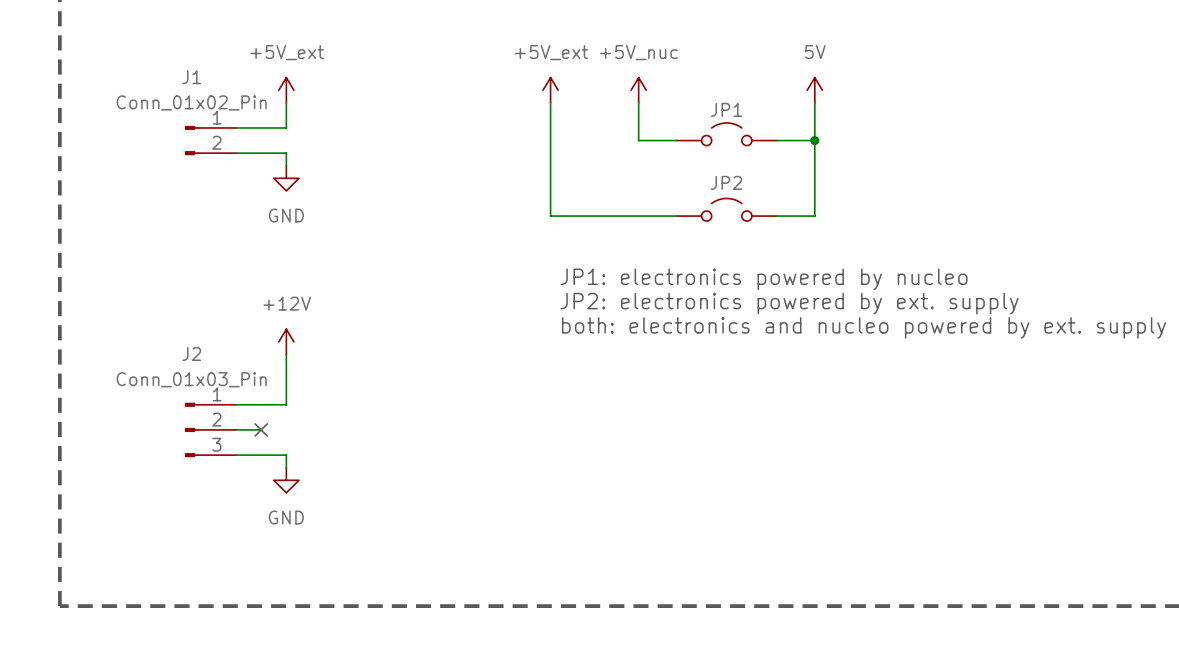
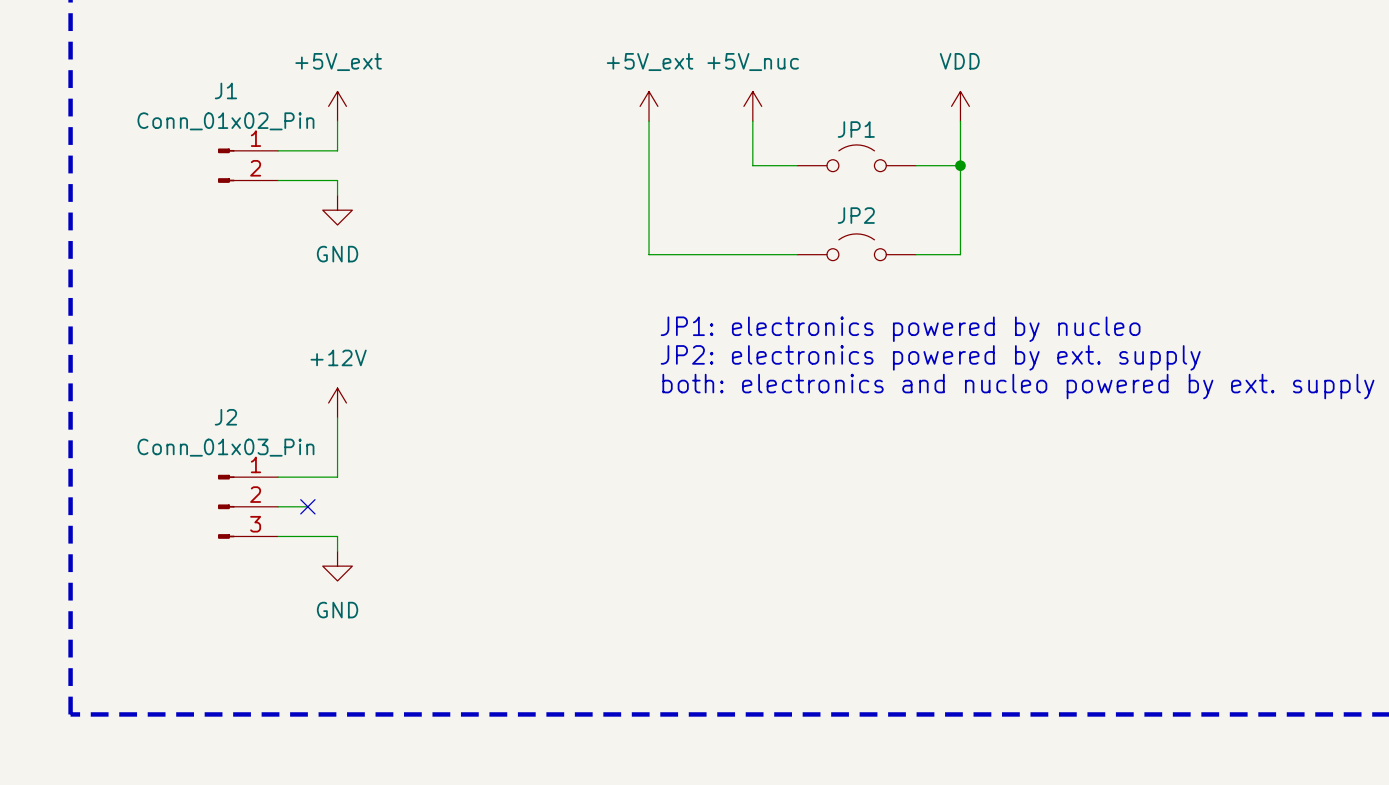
power symbol: 5V (814, 90) -> VDD (960, 106)

